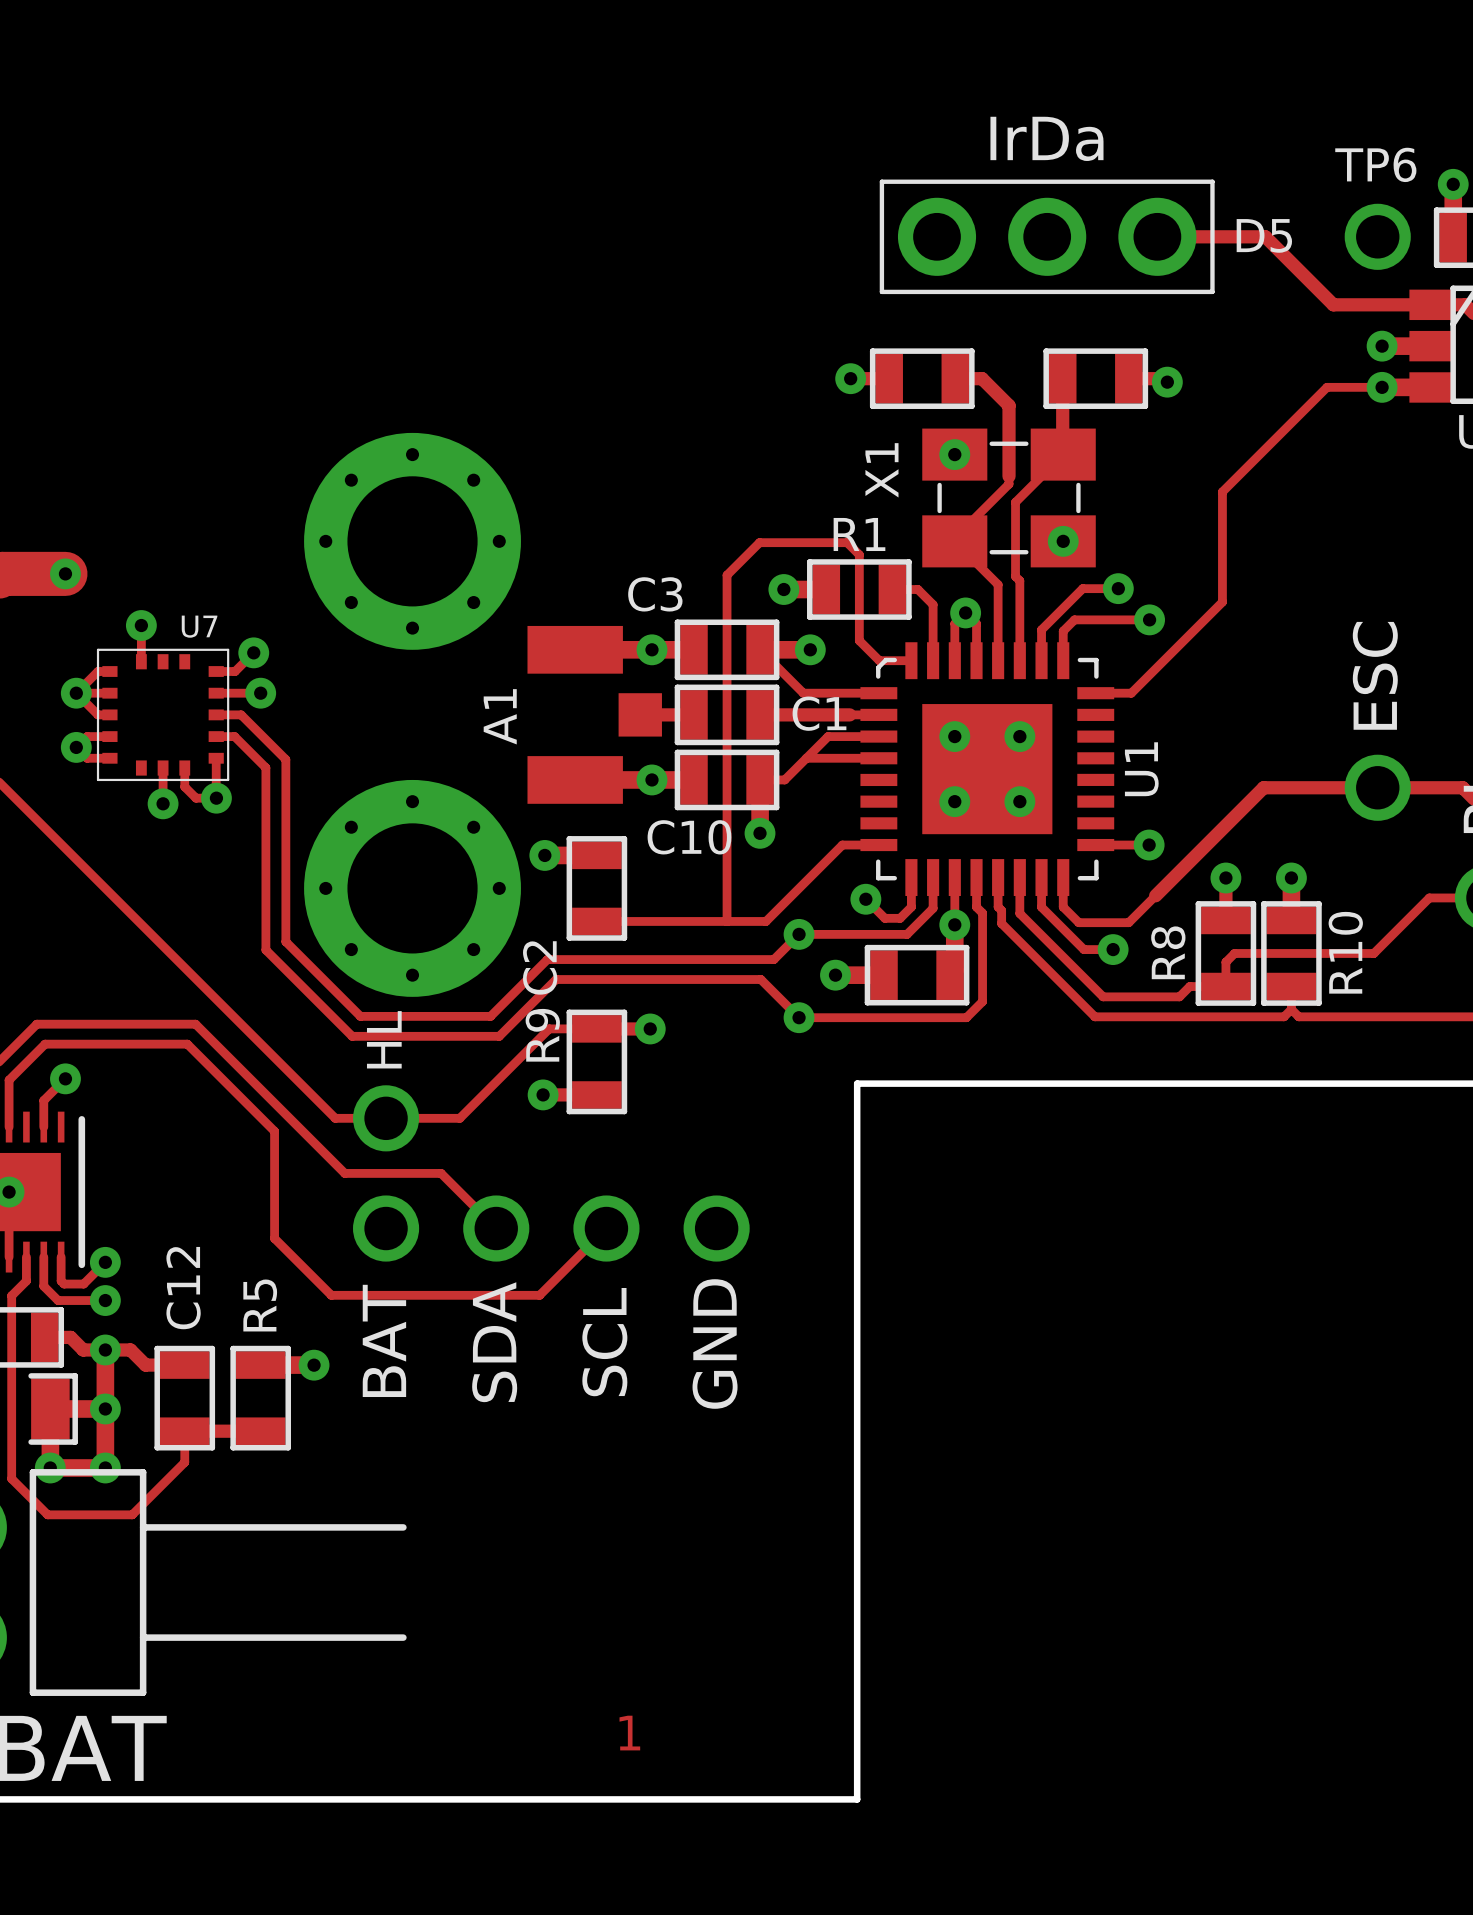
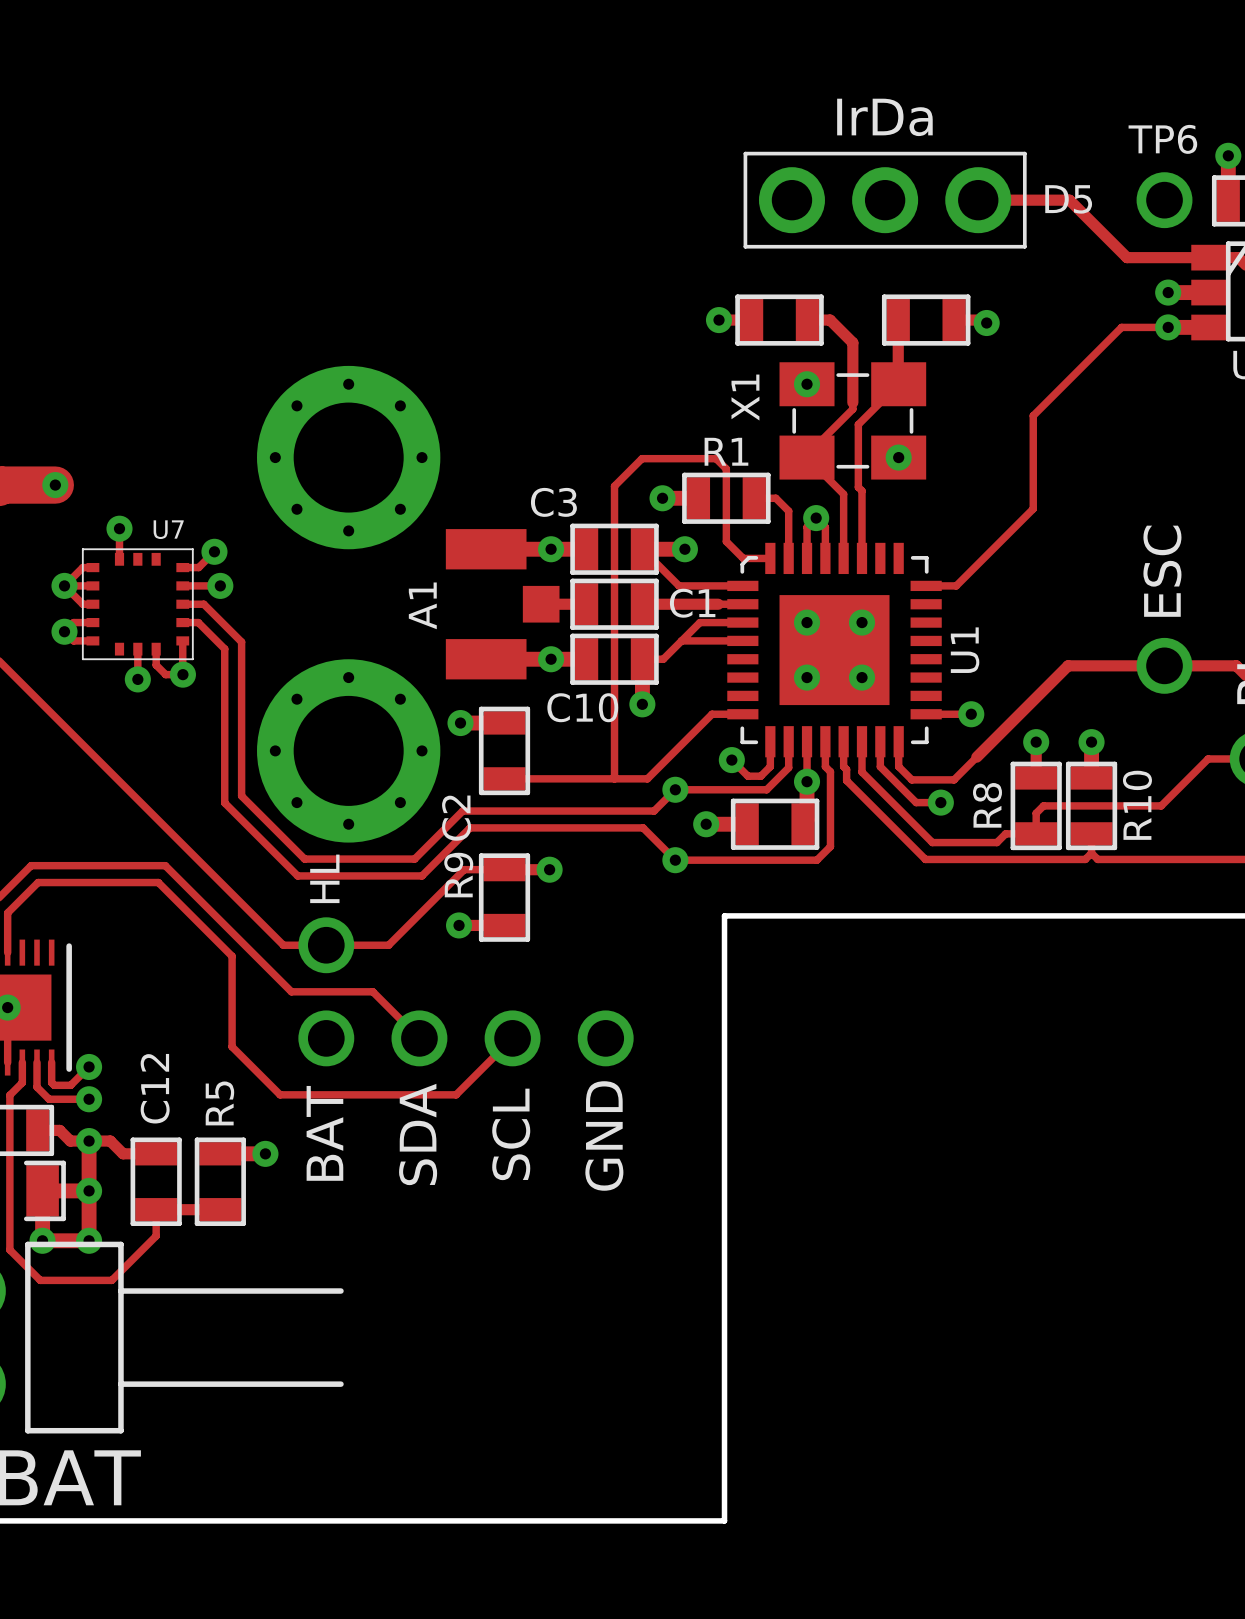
track: (1118, 588) (1082, 588) (1041, 629) (1041, 660) -> none
via: (1118, 588) -> none
track: (1149, 619) (1074, 619) (1063, 631) (1063, 660) -> none
via: (1149, 619) -> none
track: (65, 1078) (43, 1100) (43, 1127) -> none
via: (65, 1078) -> none
text: 1 (629, 1733) -> none

